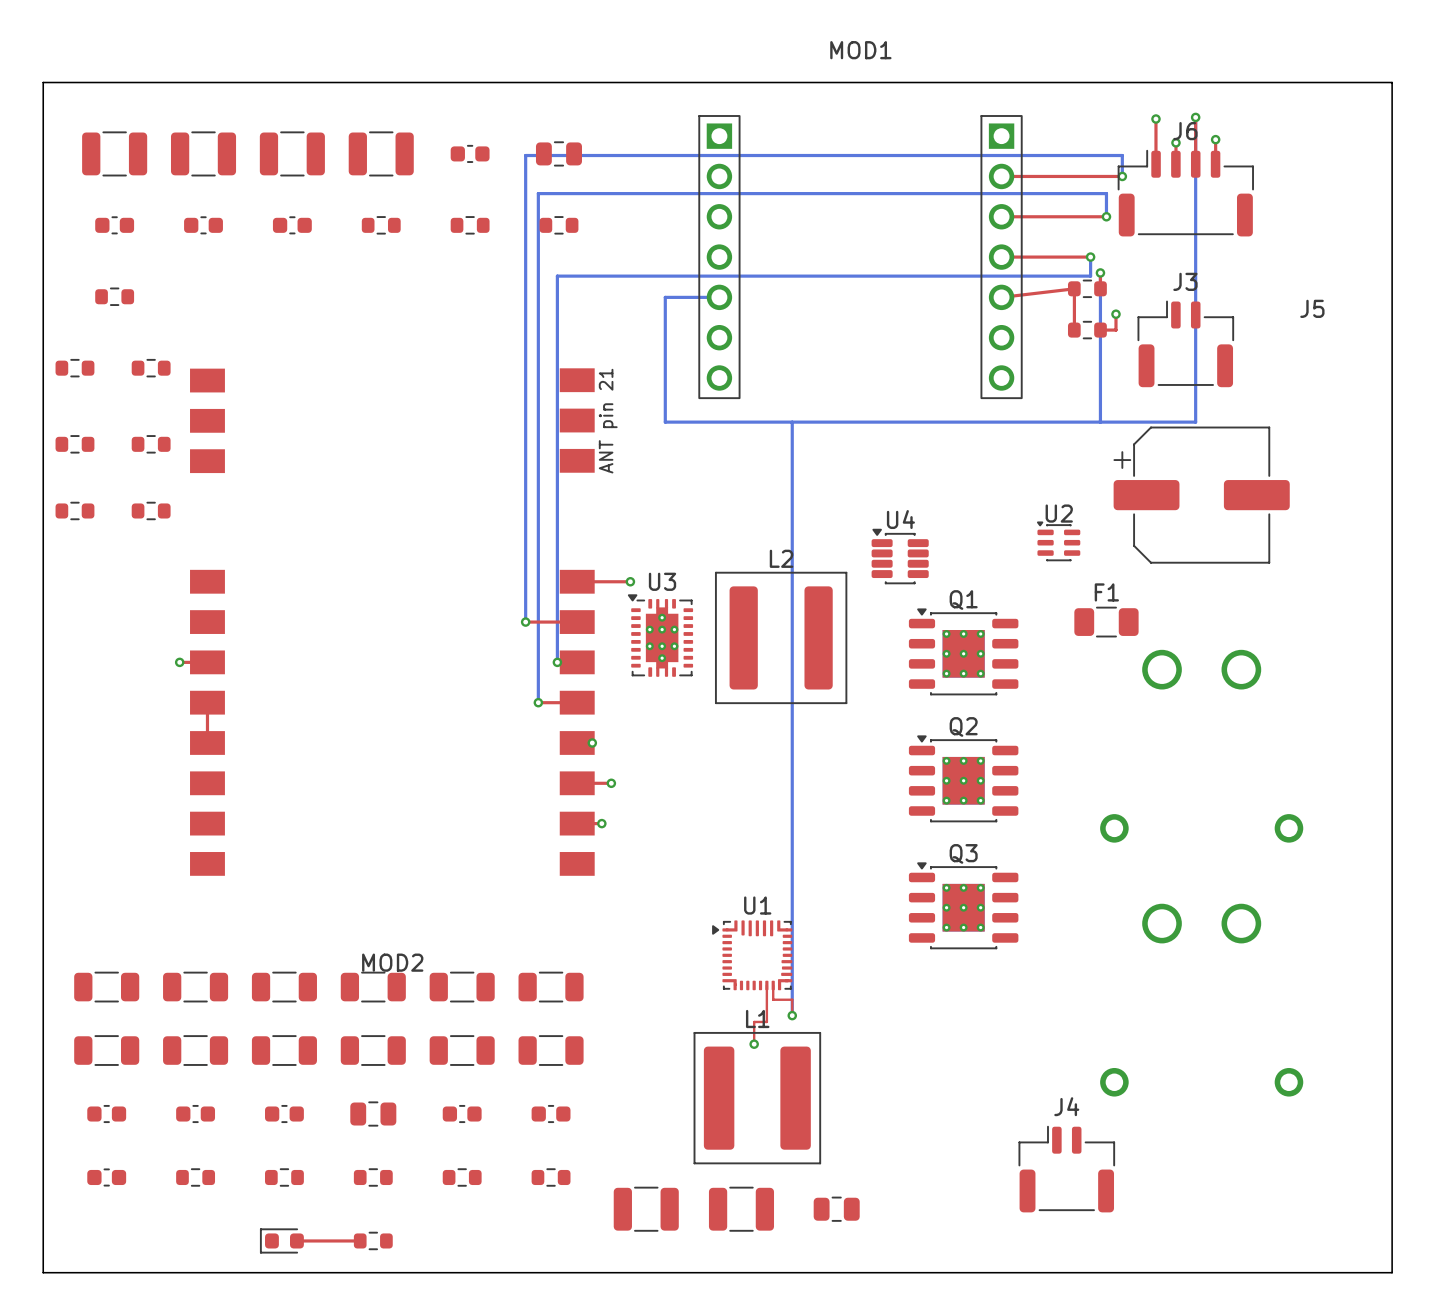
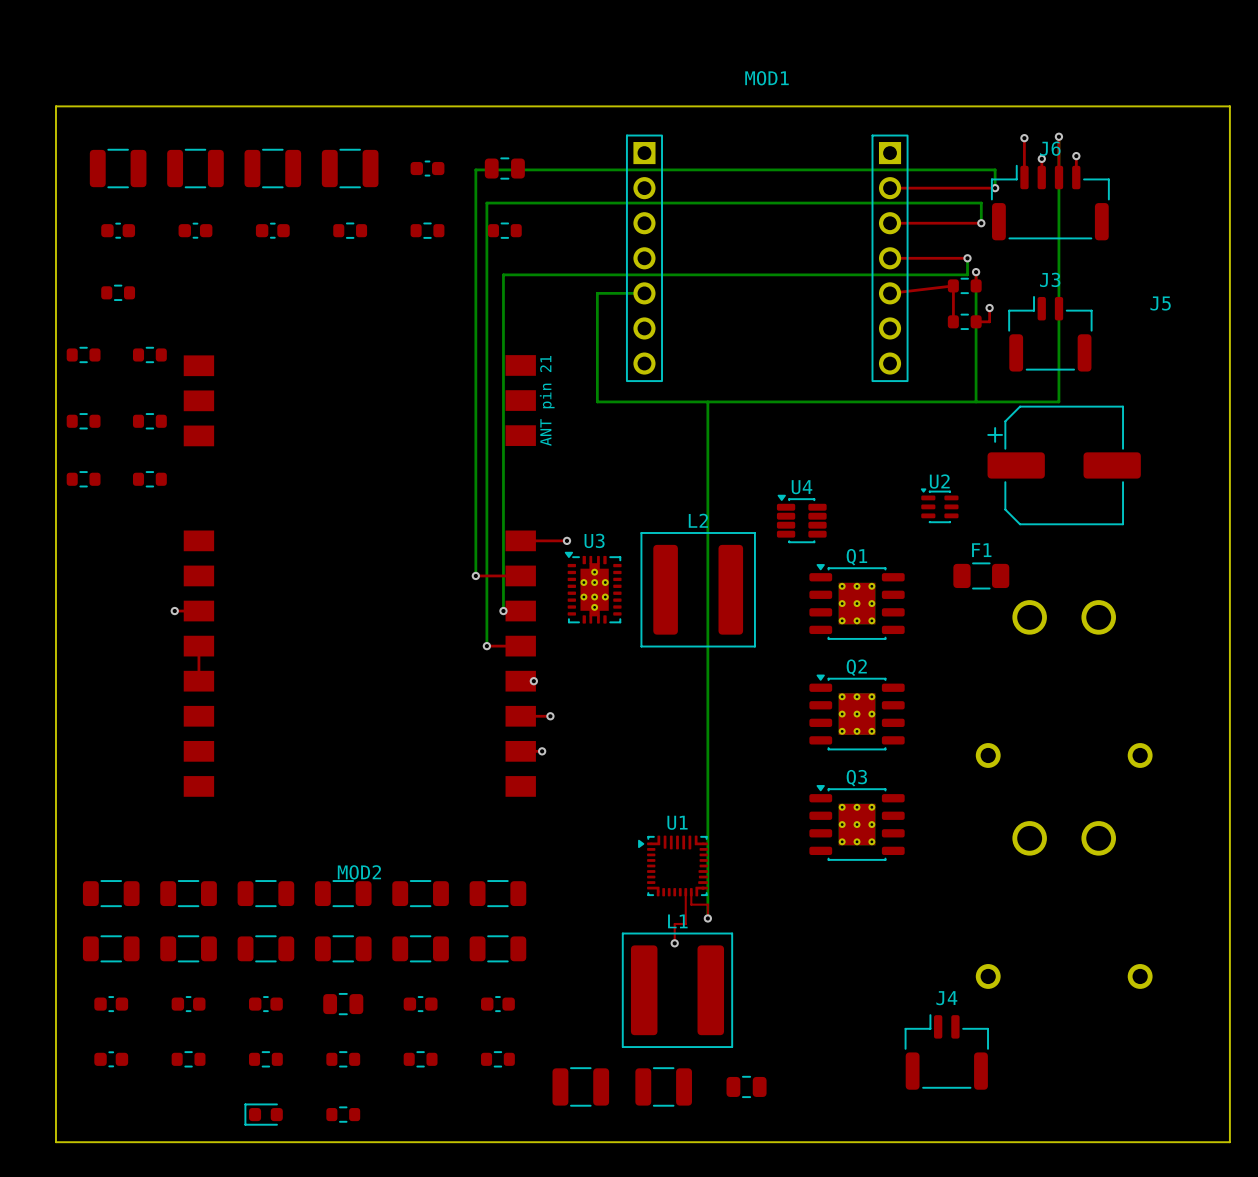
top track: (296, 1240) (360, 1240) -> none

